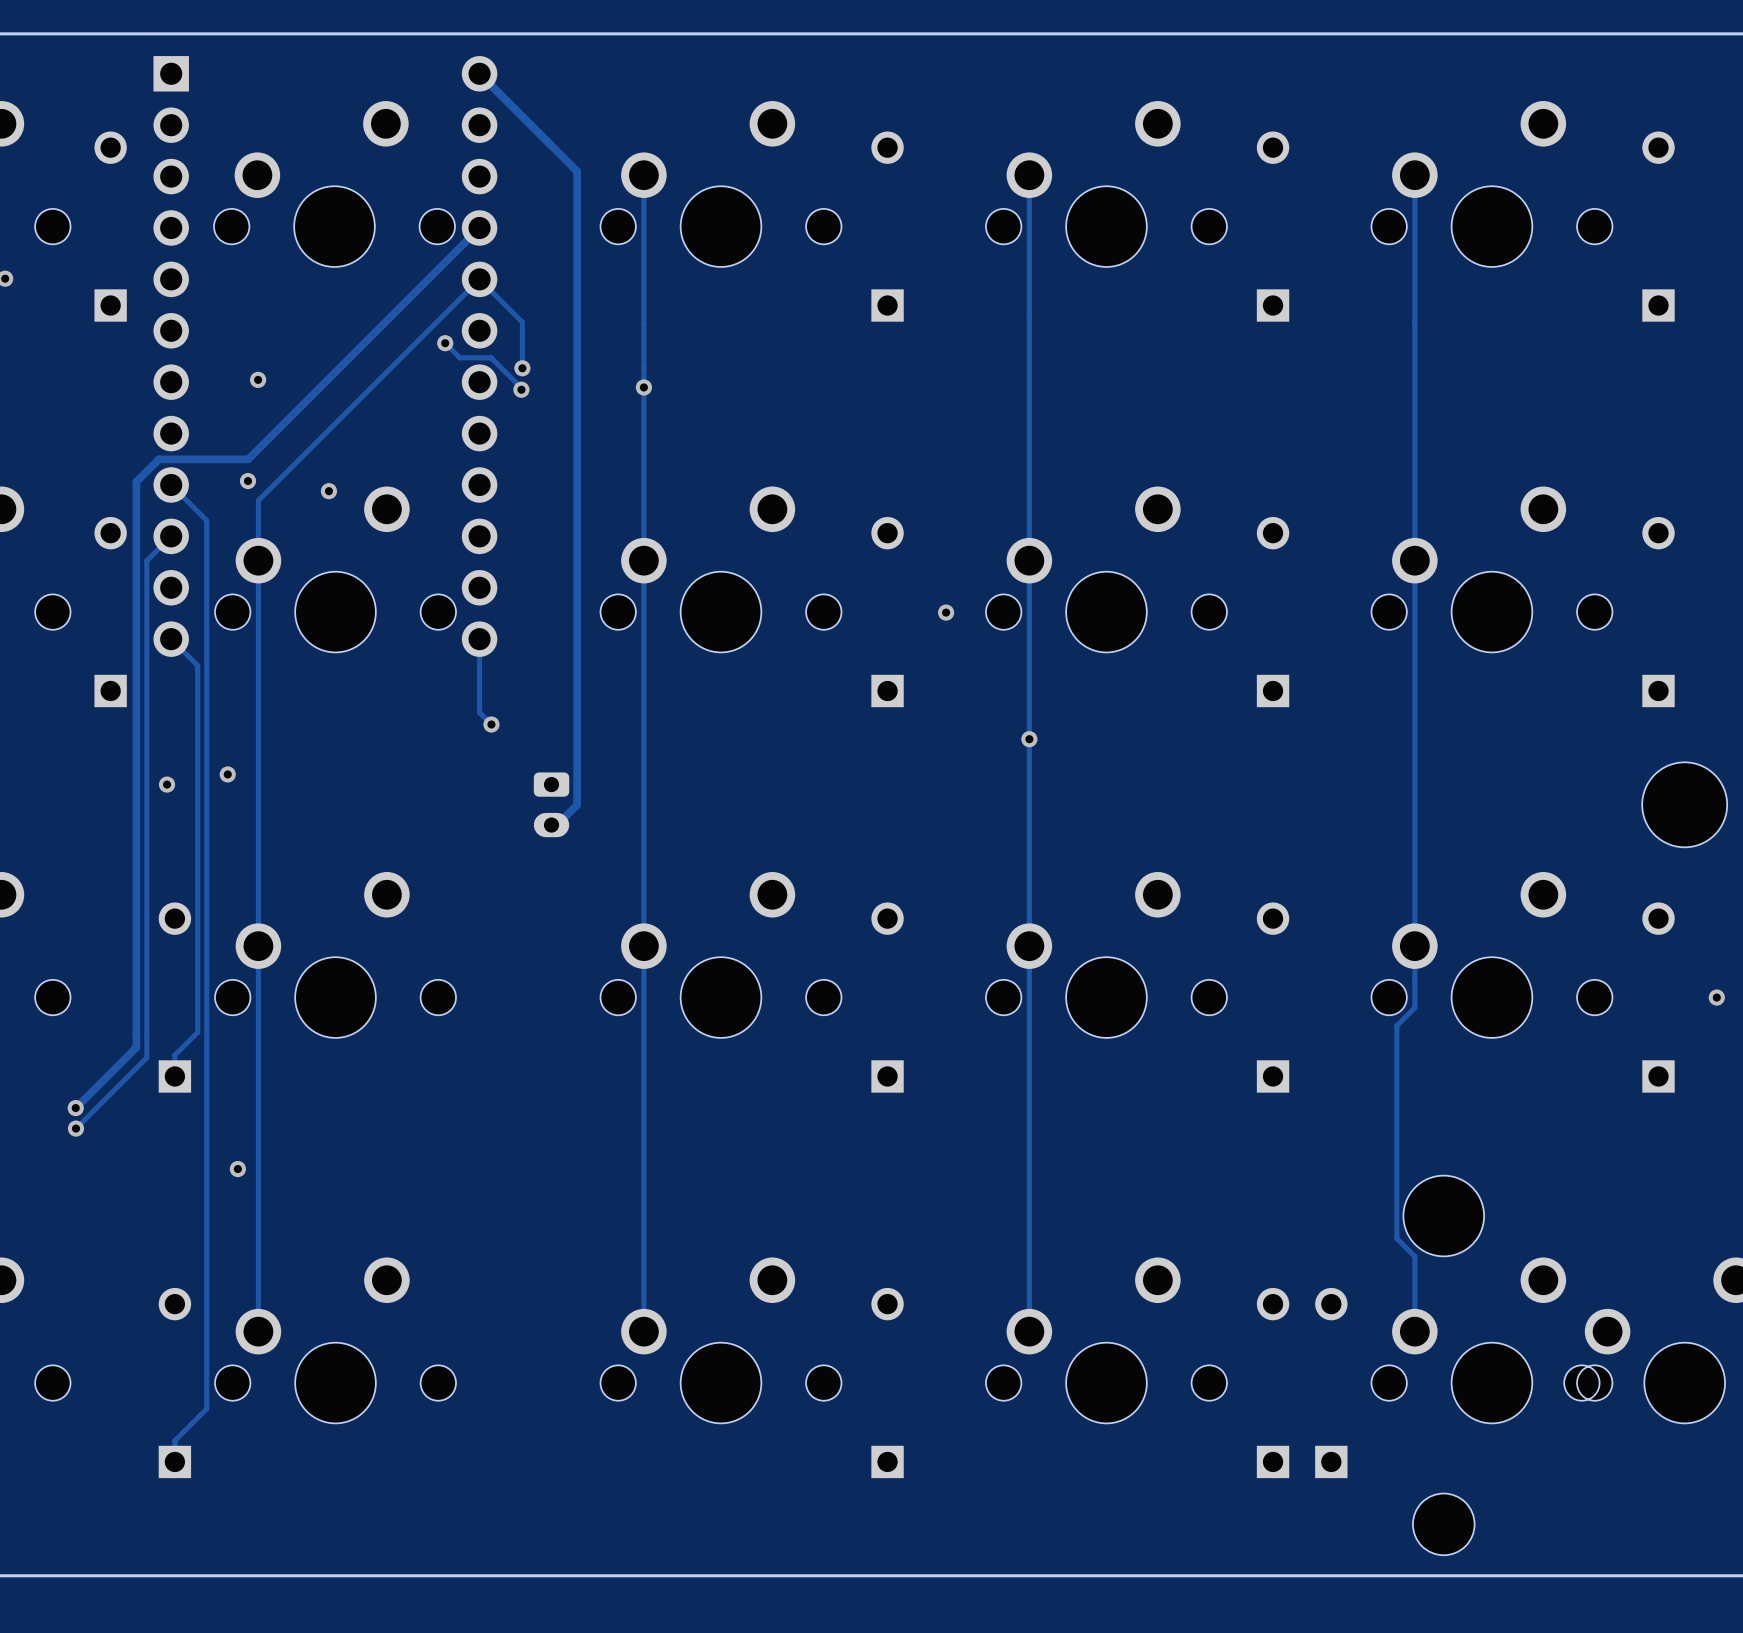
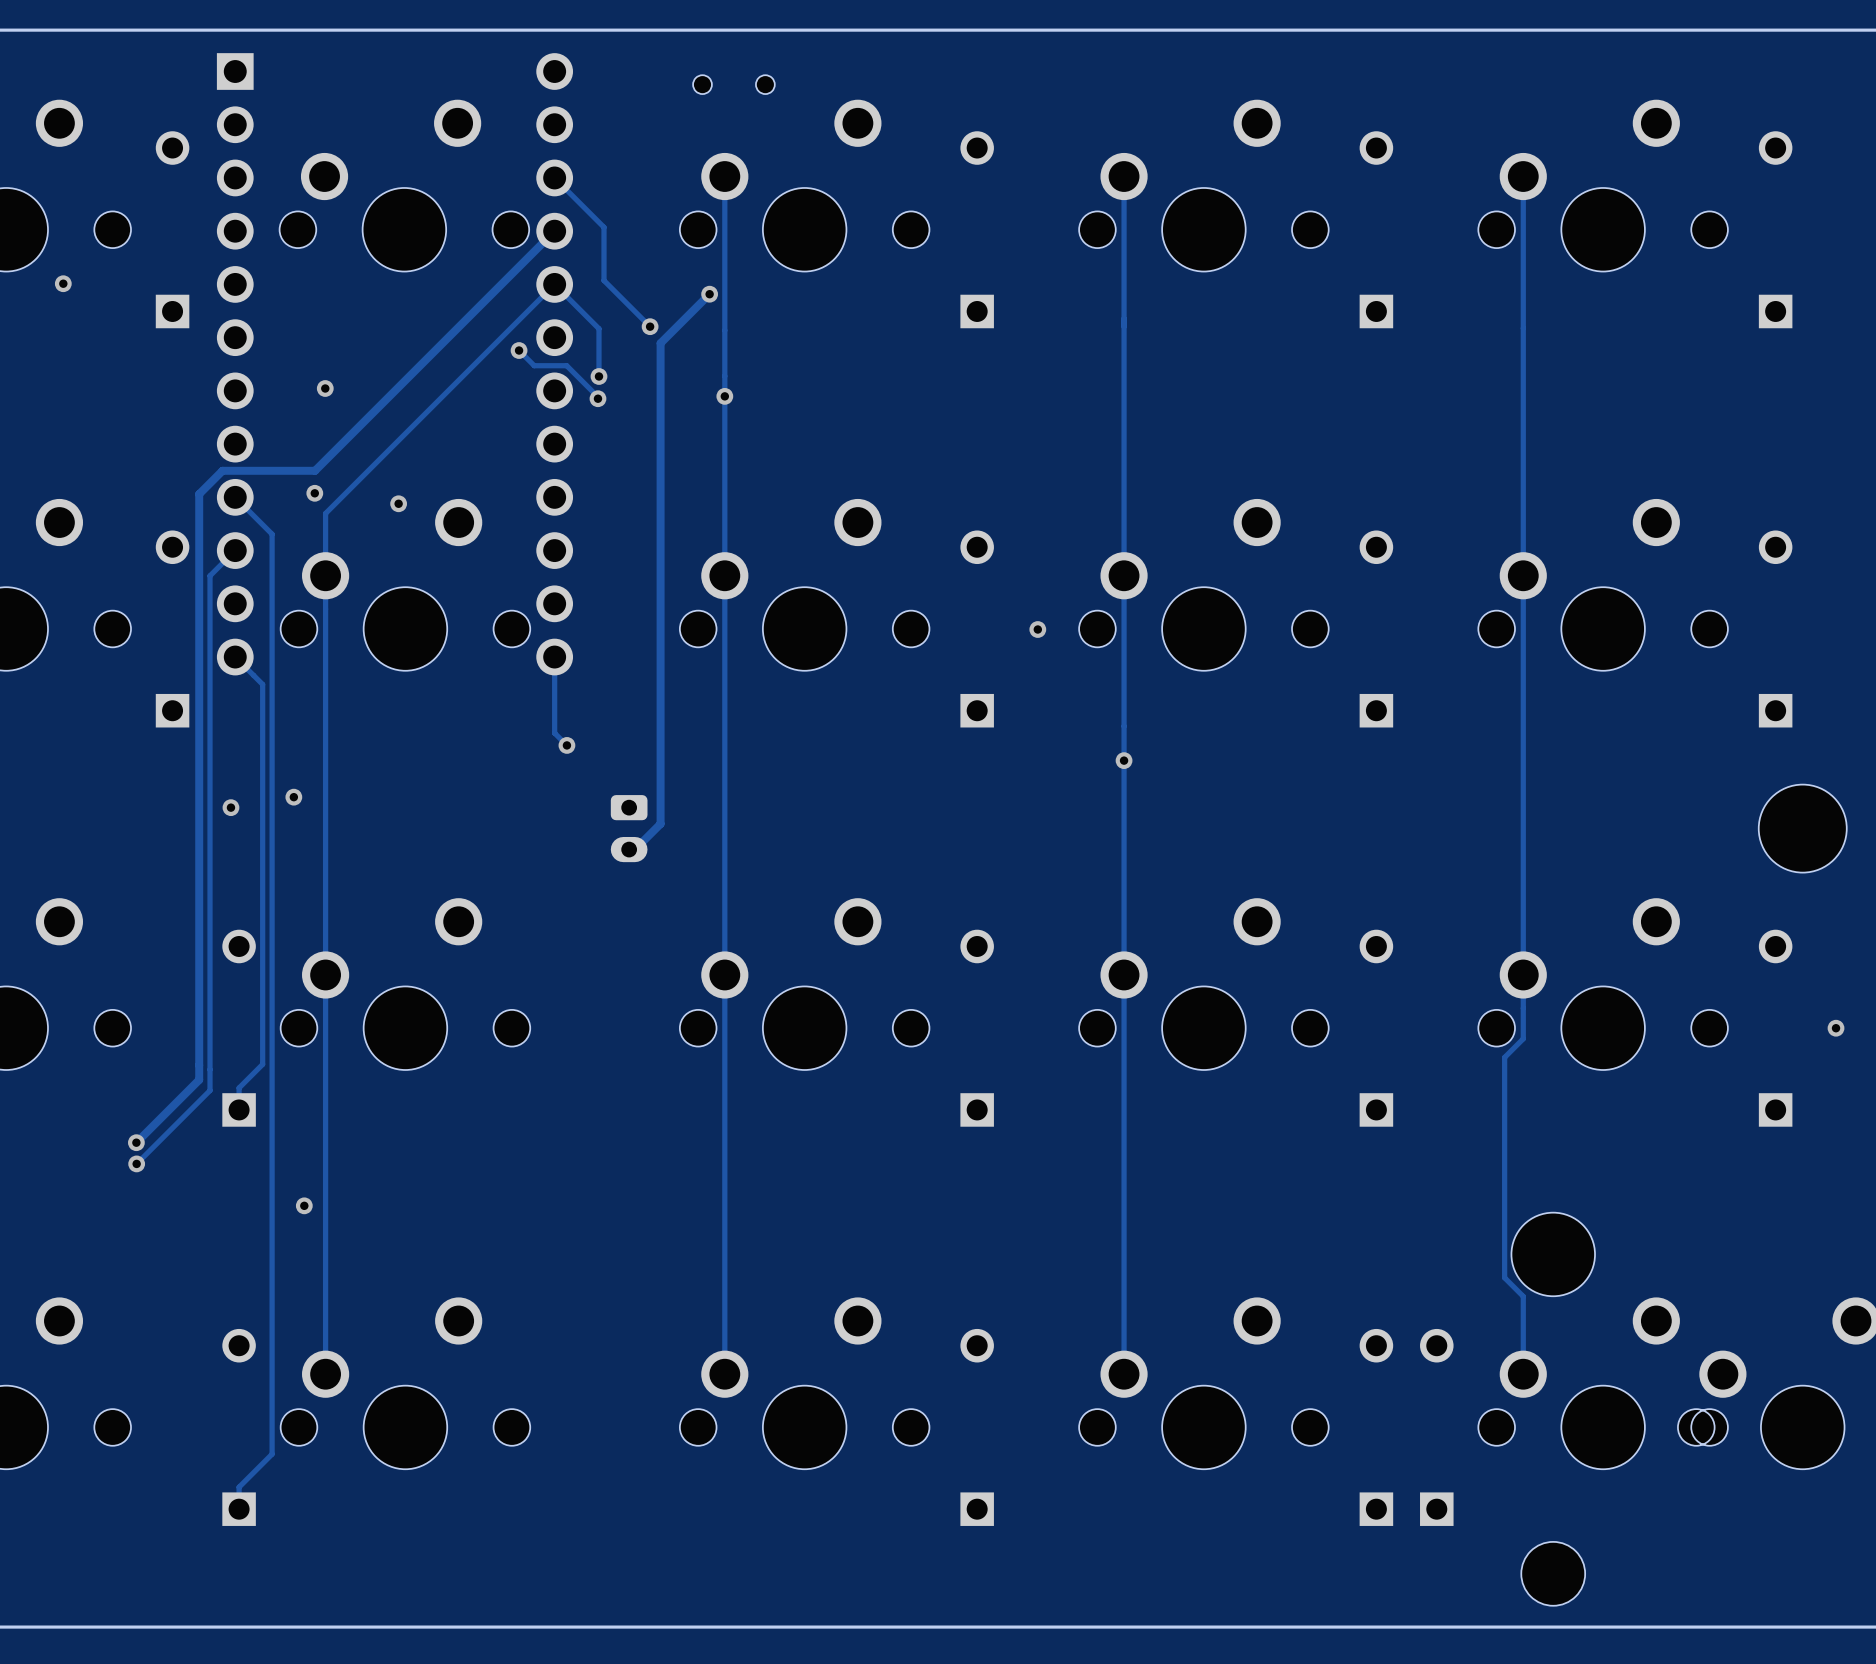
track: (479, 73) (577, 171) (577, 805) -> (709, 294) (660, 343) (660, 823) (655, 828)
part: none -> (733, 84)
track: none -> (554, 177) (604, 227) (604, 280) (650, 326)
via: none -> (709, 294)
via: none -> (650, 326)

